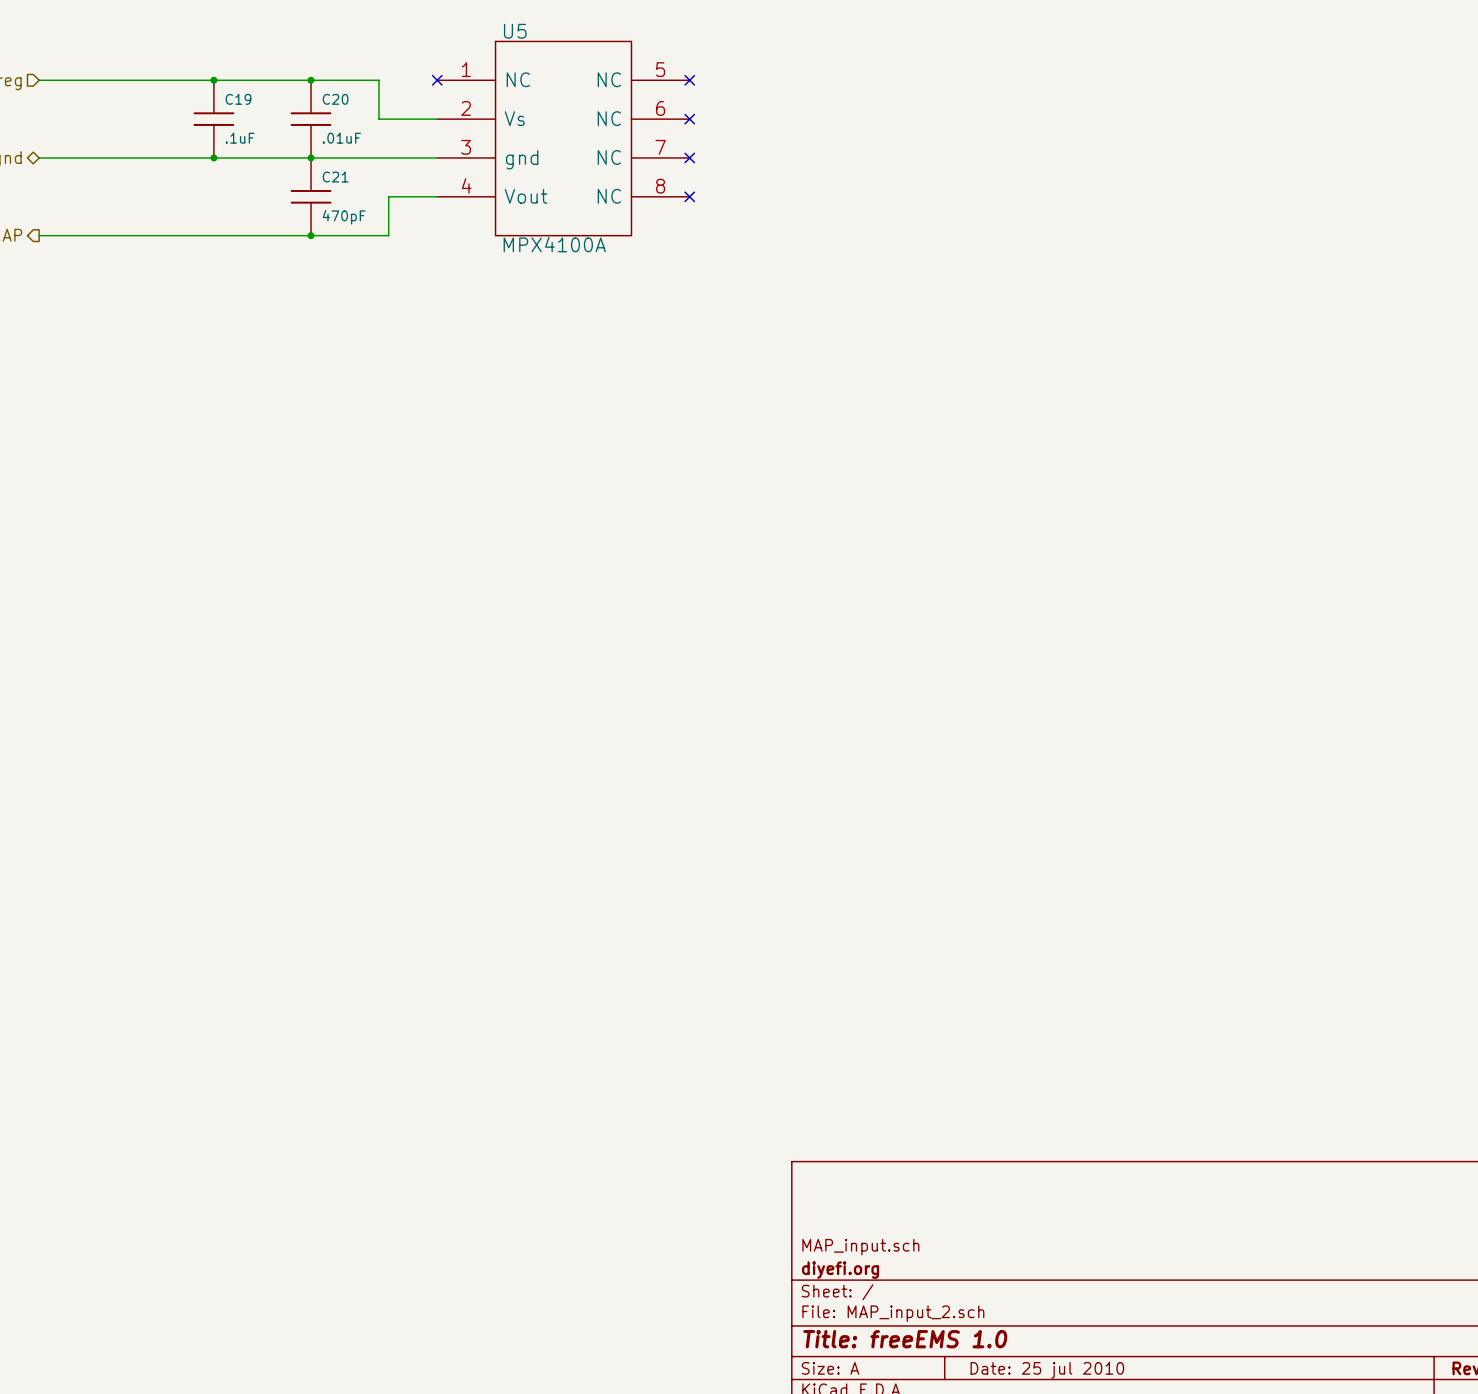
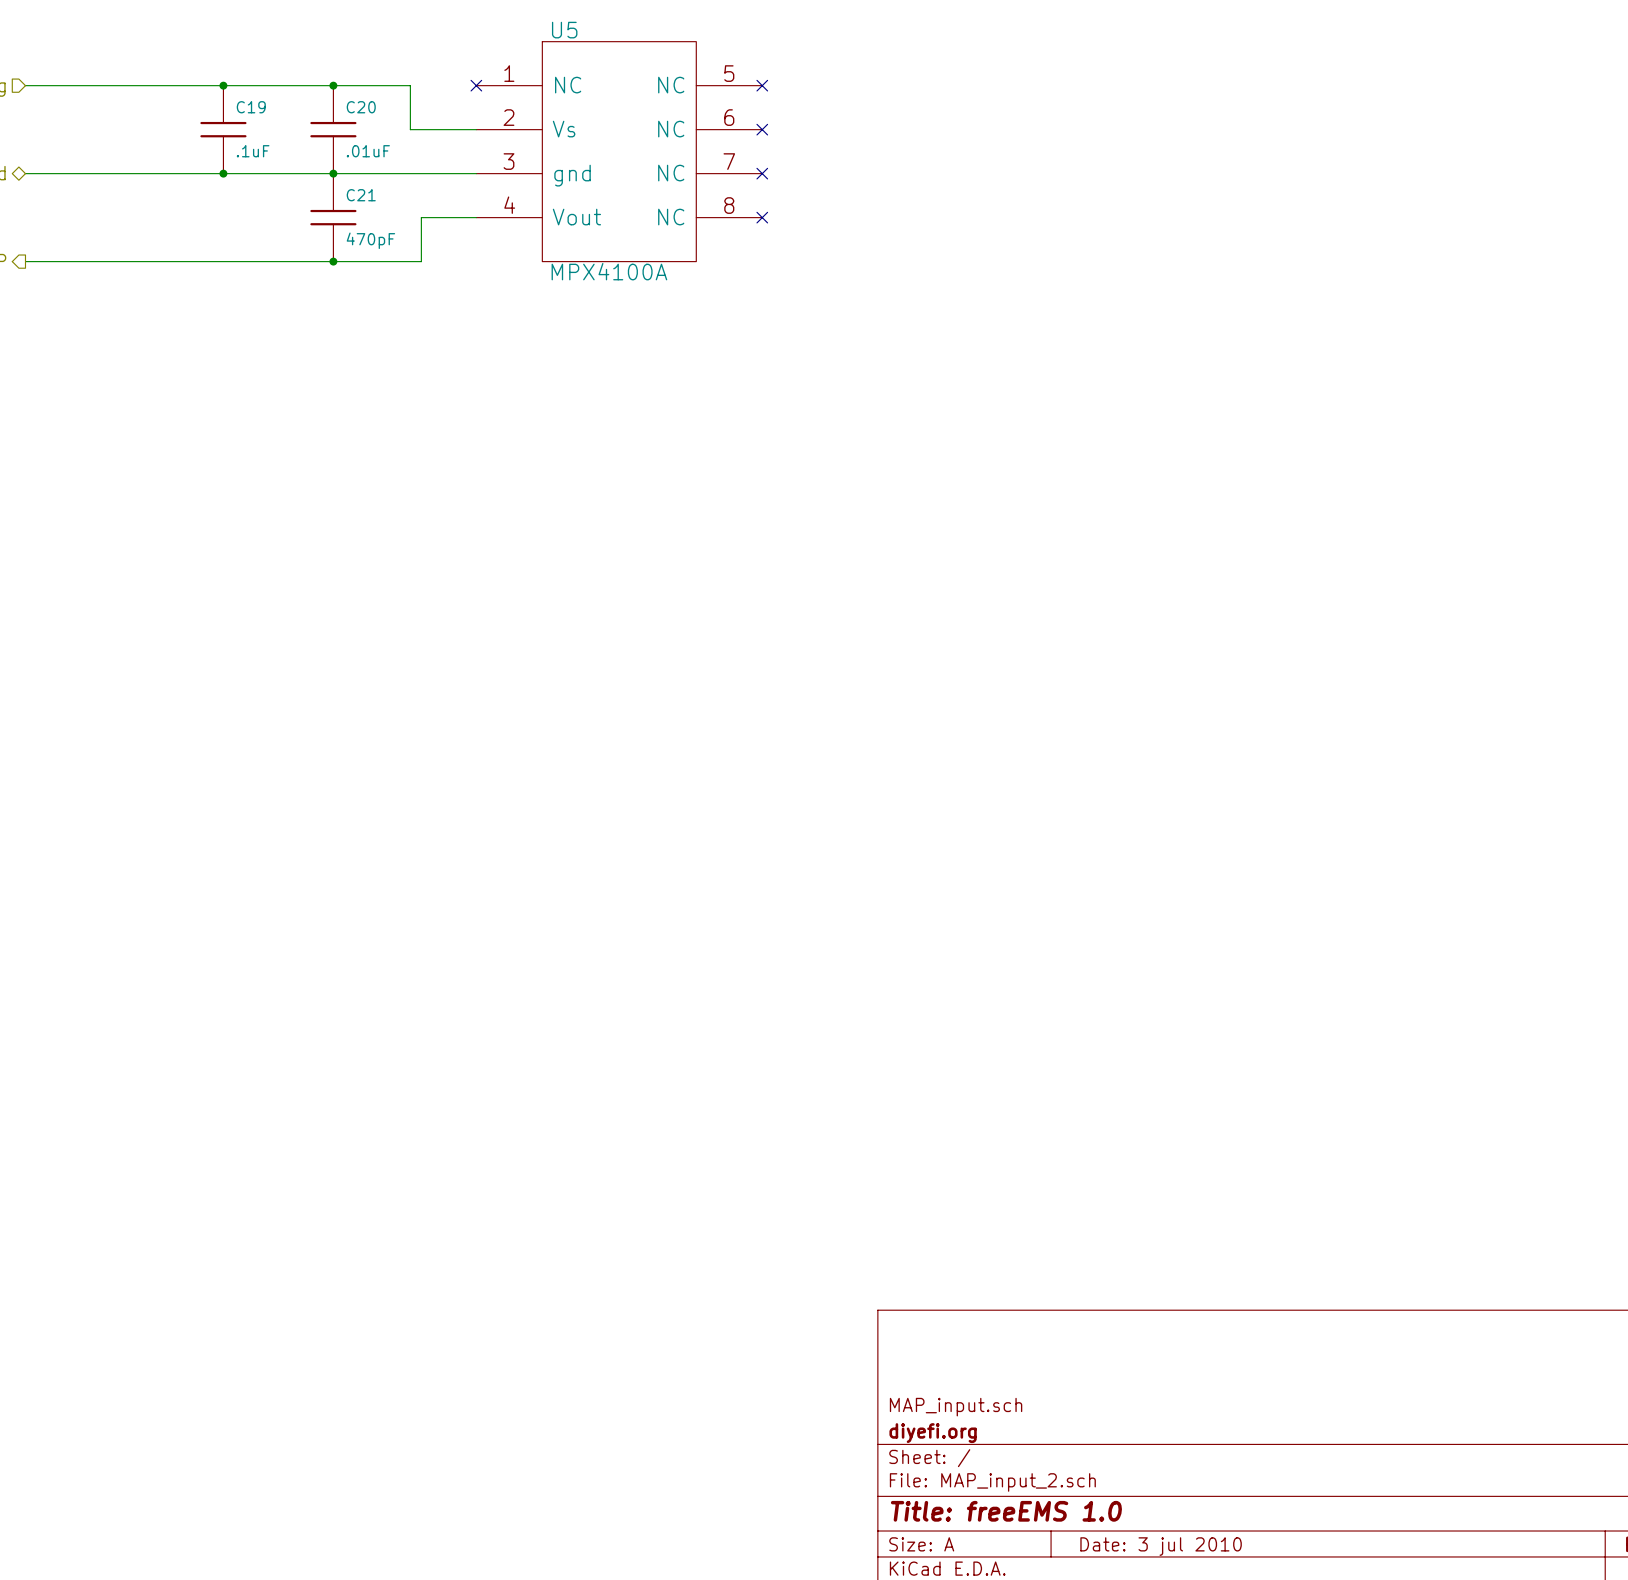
title block: Date: 25 jul 2010 (1047, 1370) -> Date: 3 jul 2010 (1161, 1546)

